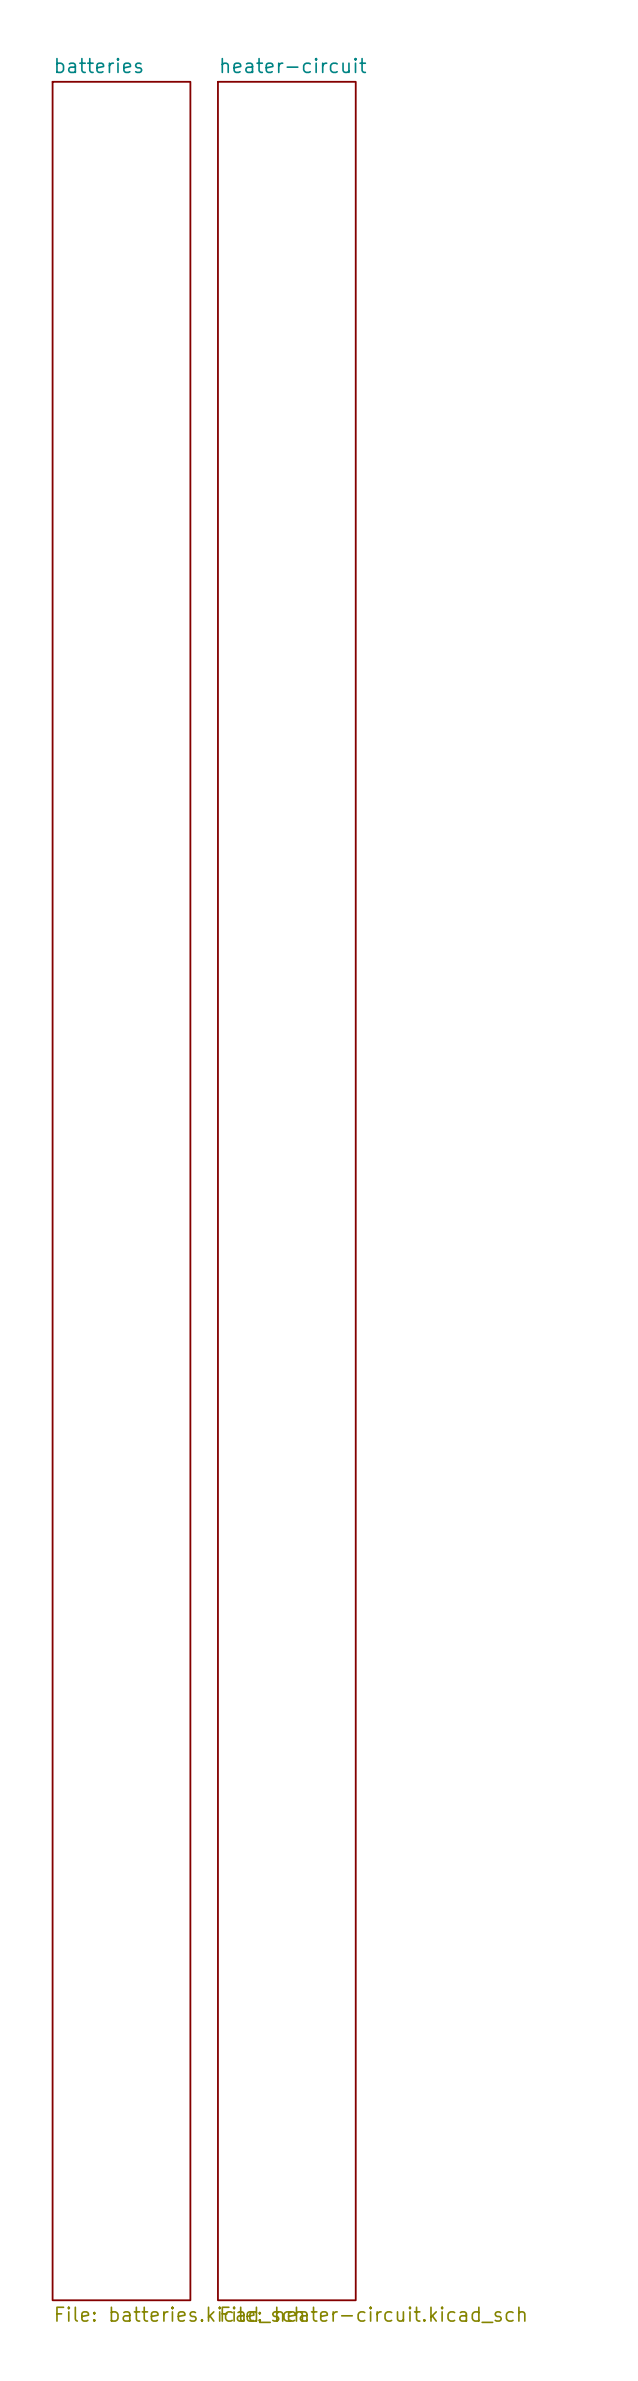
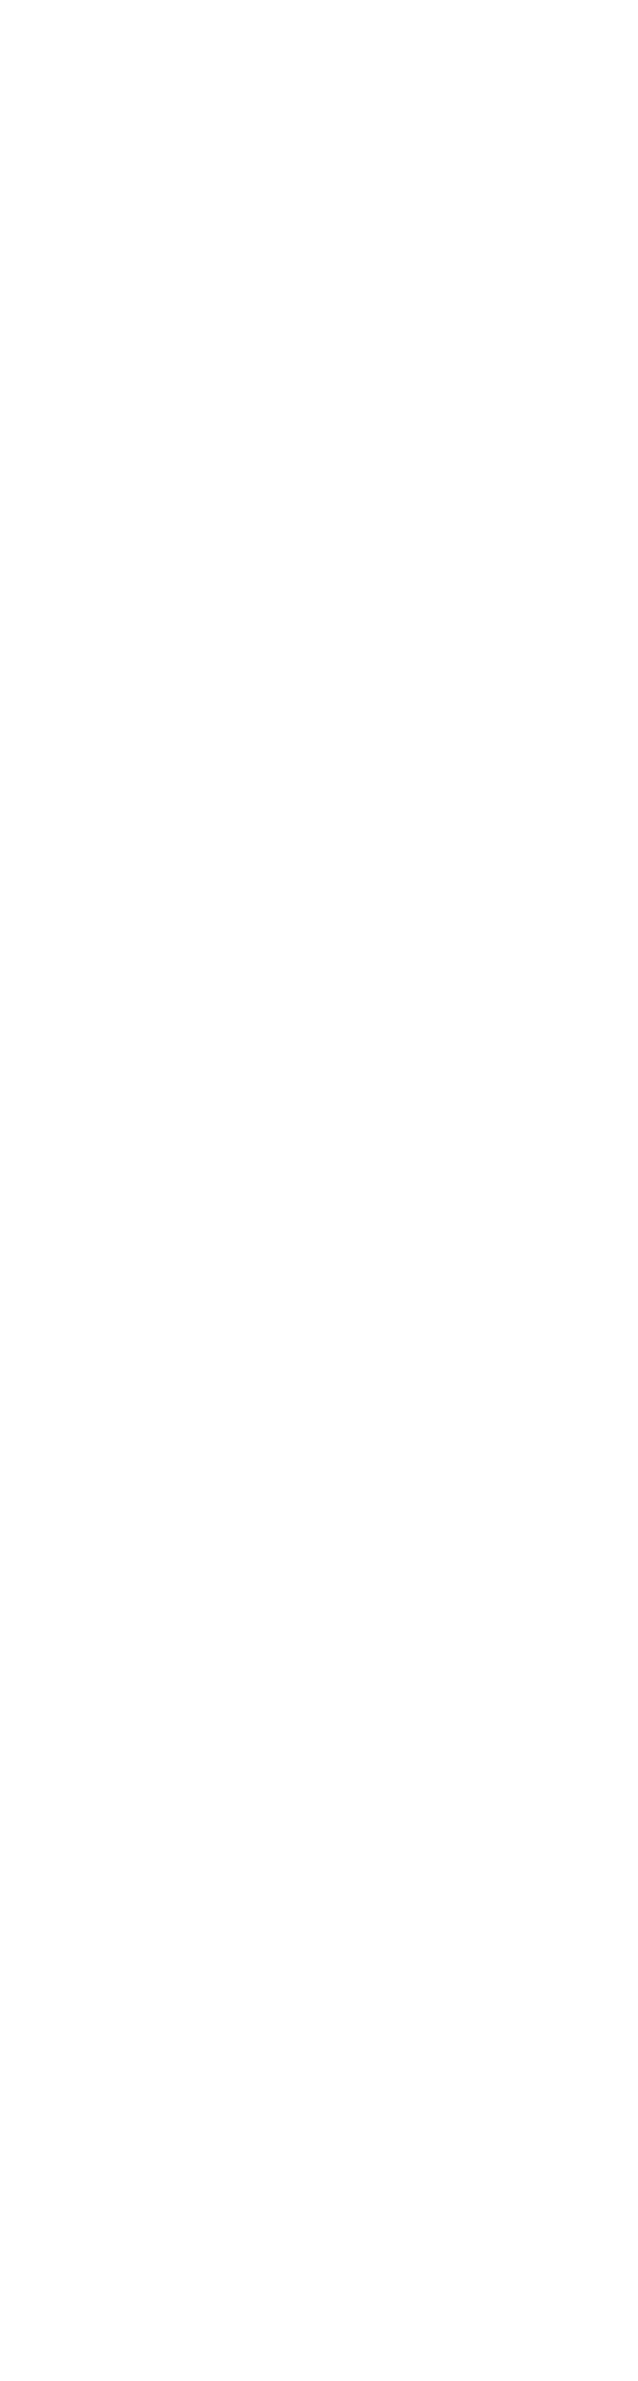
sheet batteries: File: batteries.kicad_sch (121, 1191) -> none
sheet heater-circuit: File: heater-circuit.kicad_sch (286, 1191) -> none

